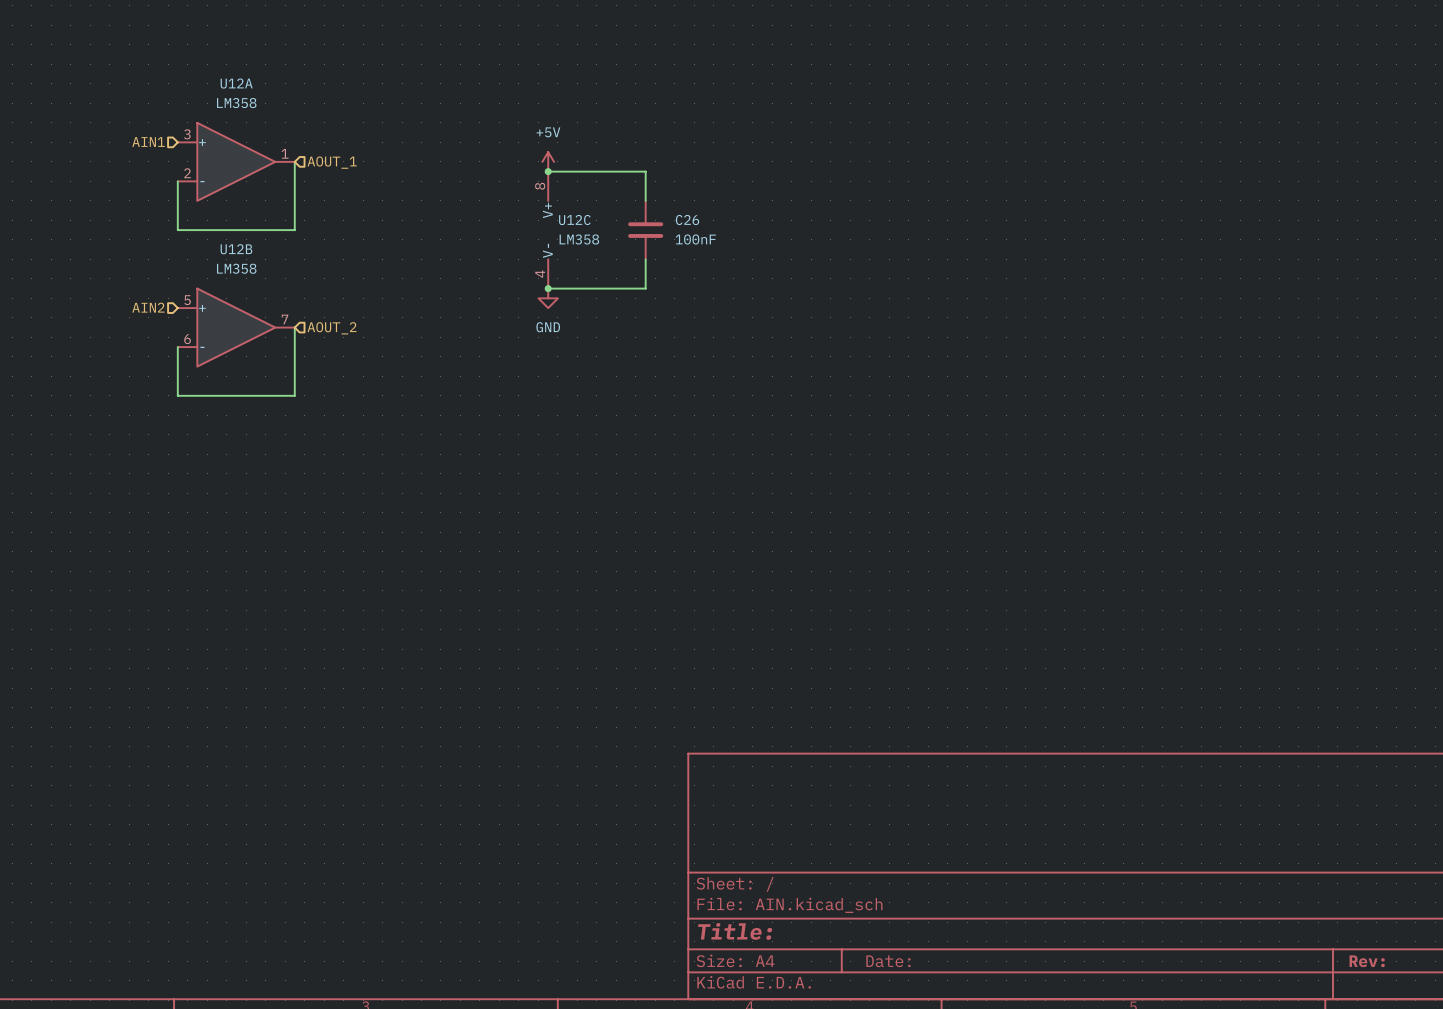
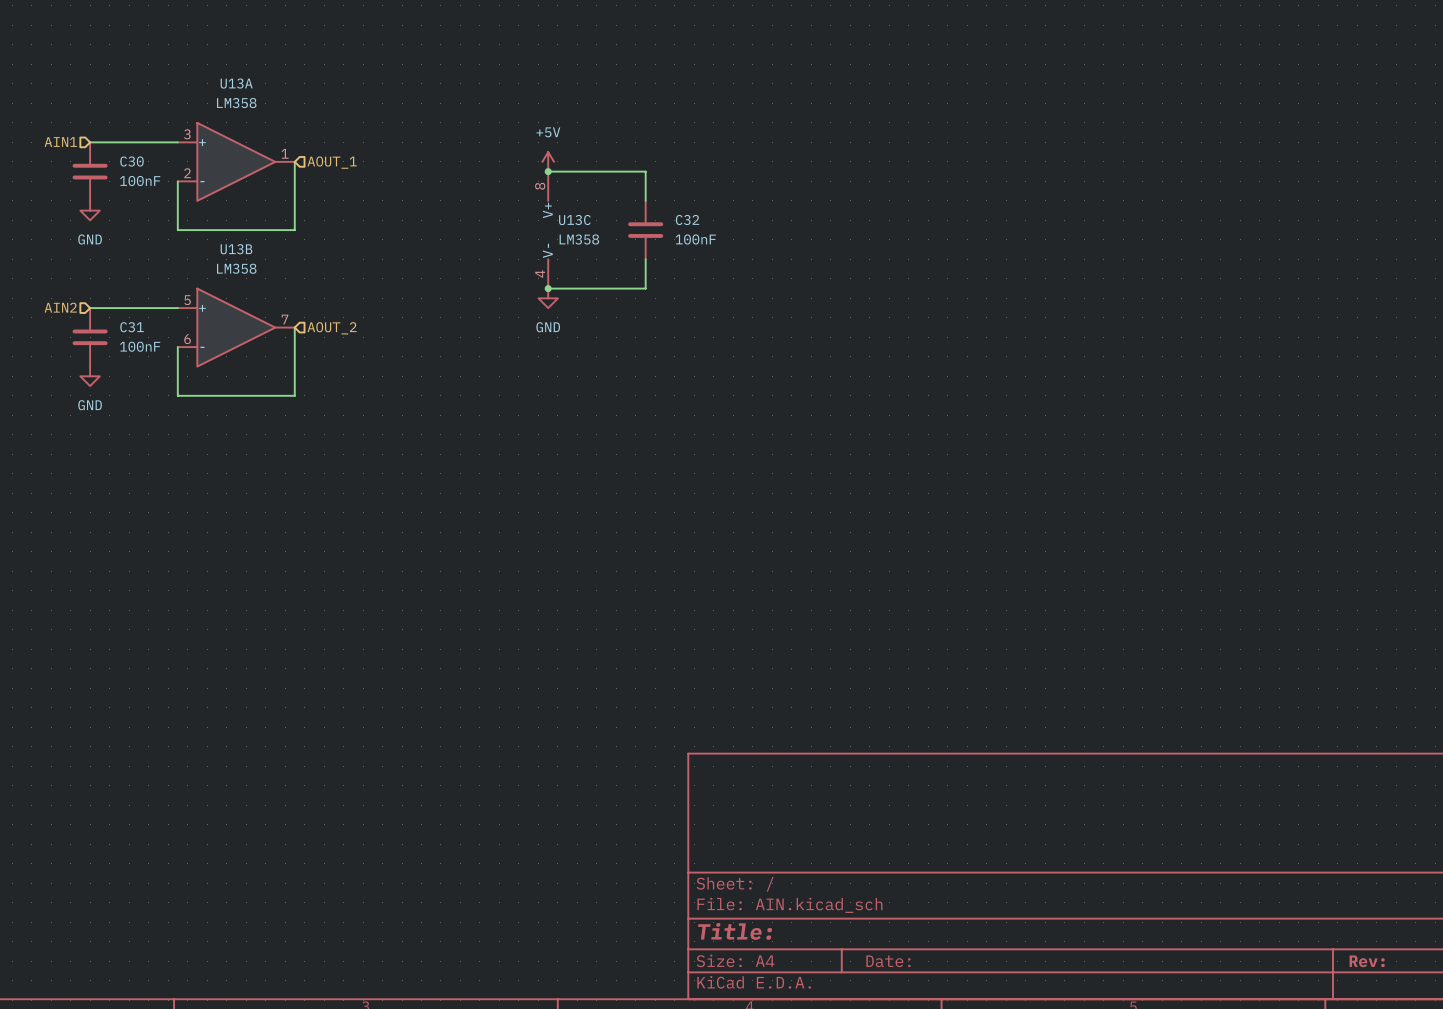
U12A name: U12A (236, 83) -> U13A (236, 83)
wire: none -> (90, 142) (177, 142)
hierarchical label position: AIN1 (148, 142) -> AIN1 (60, 142)
C30: none -> 100nF (90, 171)
power symbol: none -> GND (90, 210)
U12C name: U12C (574, 219) -> U13C (574, 219)
C26 name: C26 (687, 219) -> C32 (687, 219)
U12B name: U12B (236, 249) -> U13B (236, 249)
hierarchical label position: AIN2 (148, 307) -> AIN2 (60, 307)
wire: none -> (90, 308) (177, 308)
C31: none -> 100nF (90, 337)
power symbol: none -> GND (90, 376)

